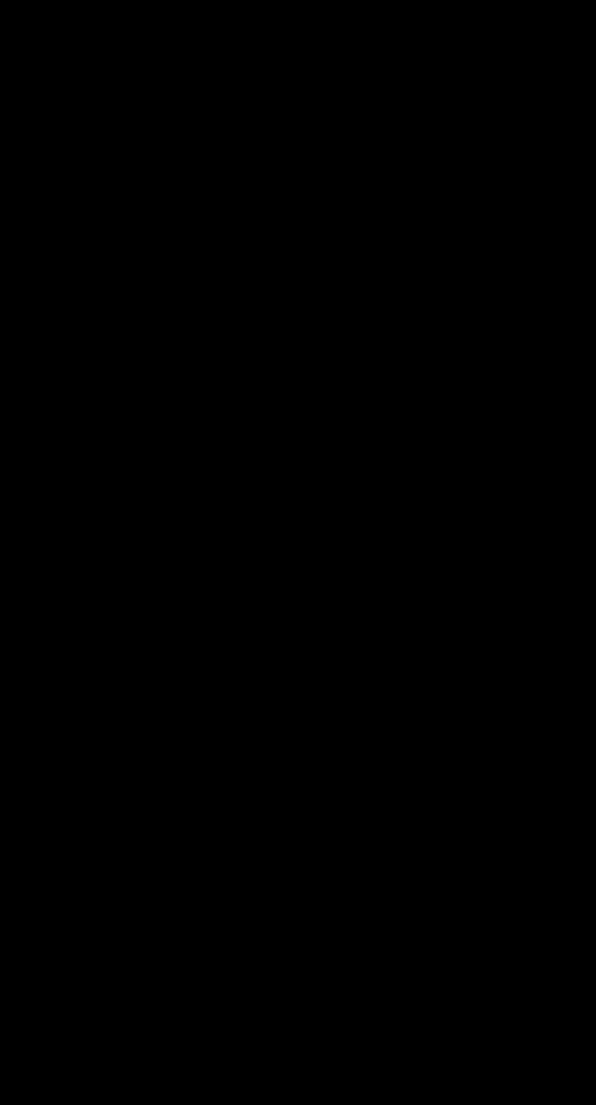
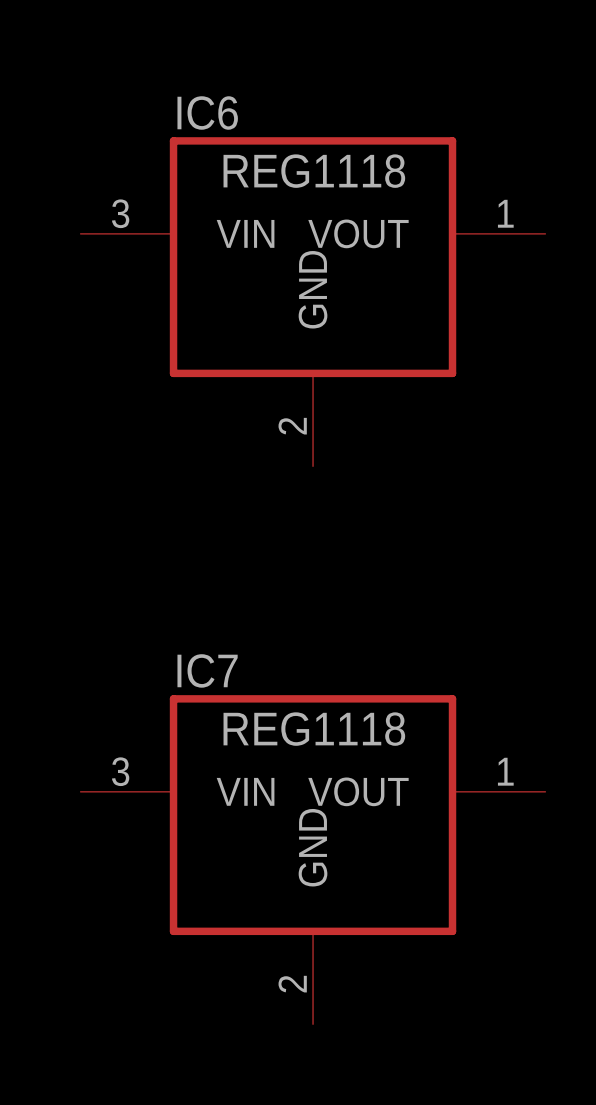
IC6: none -> REG1118 (313, 301)
IC7: none -> REG1118 (313, 859)

